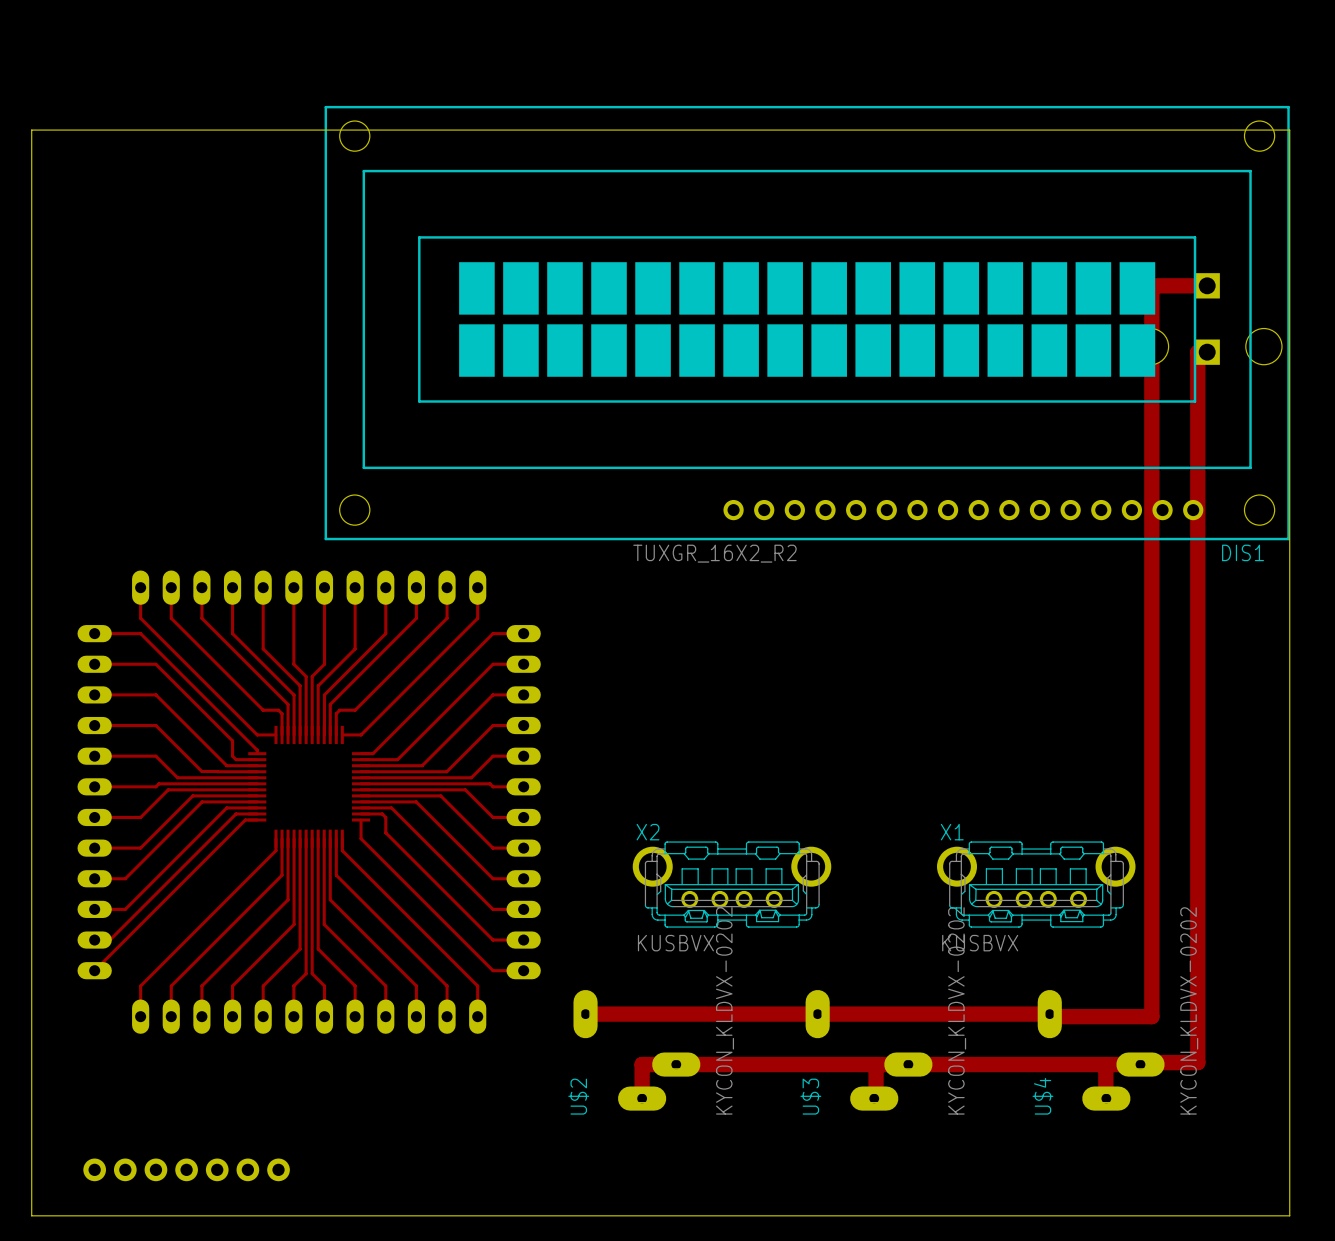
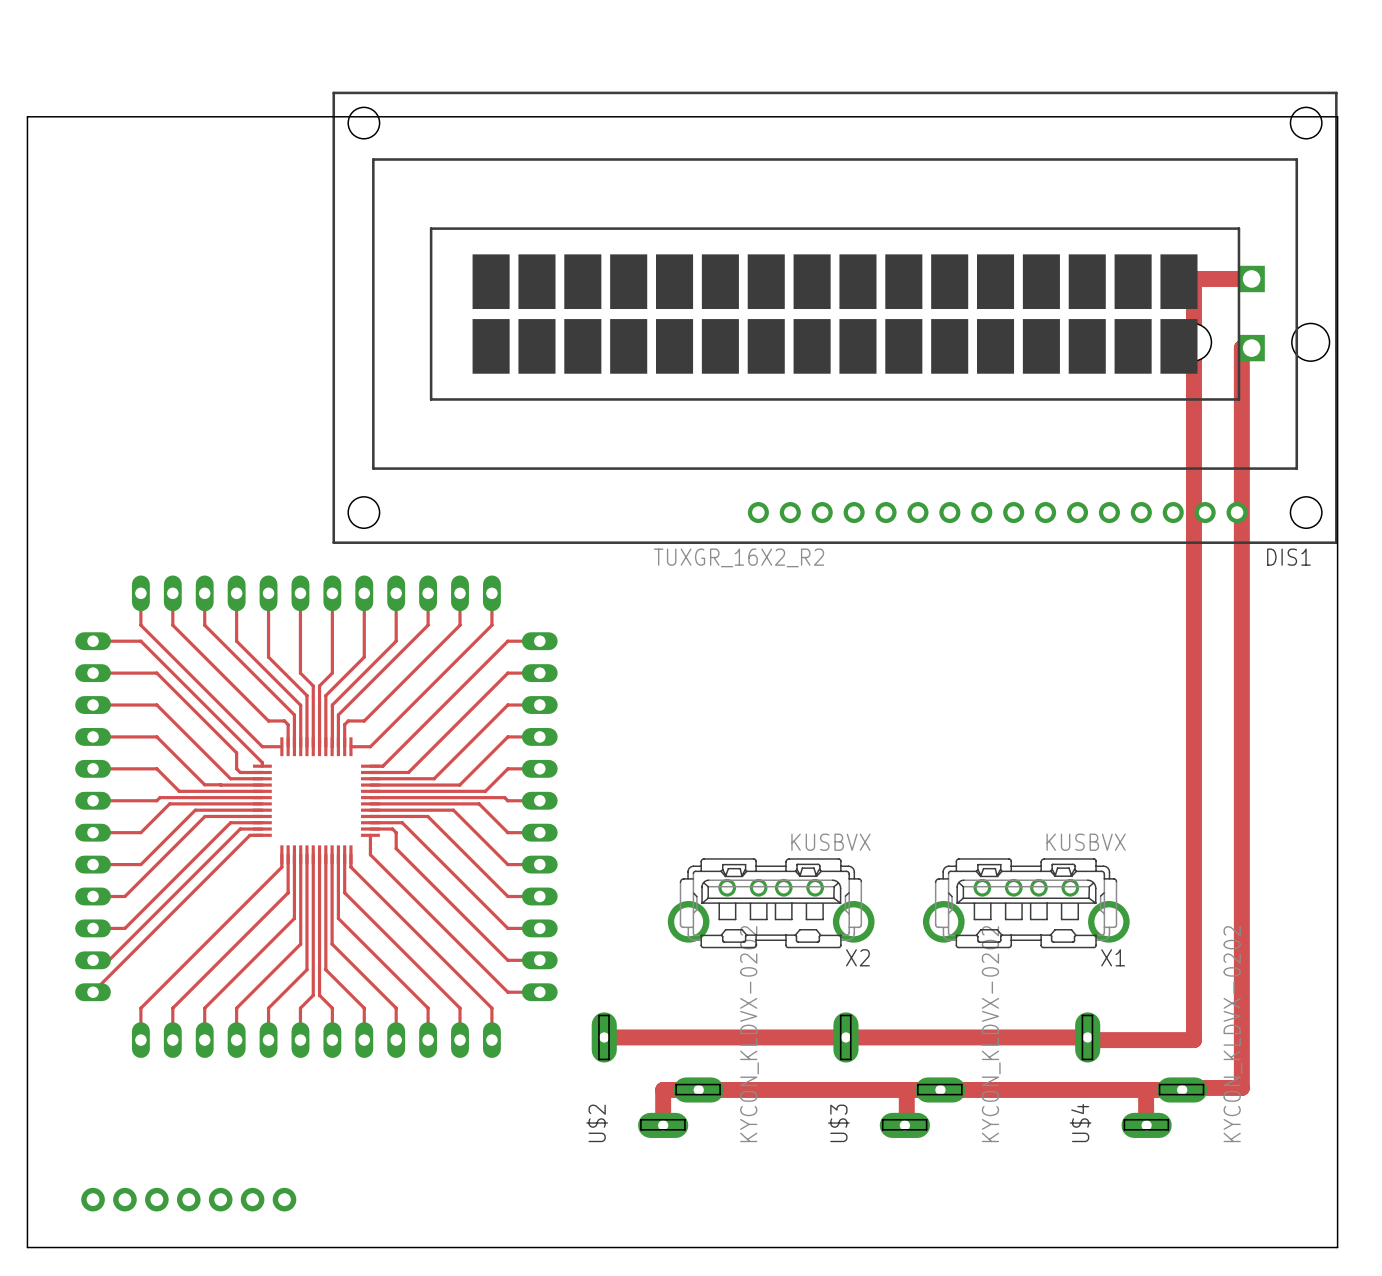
X2 rotation: 0° (732, 884) -> 180° (771, 903)
X1 rotation: 0° (1036, 884) -> 180° (1026, 903)

